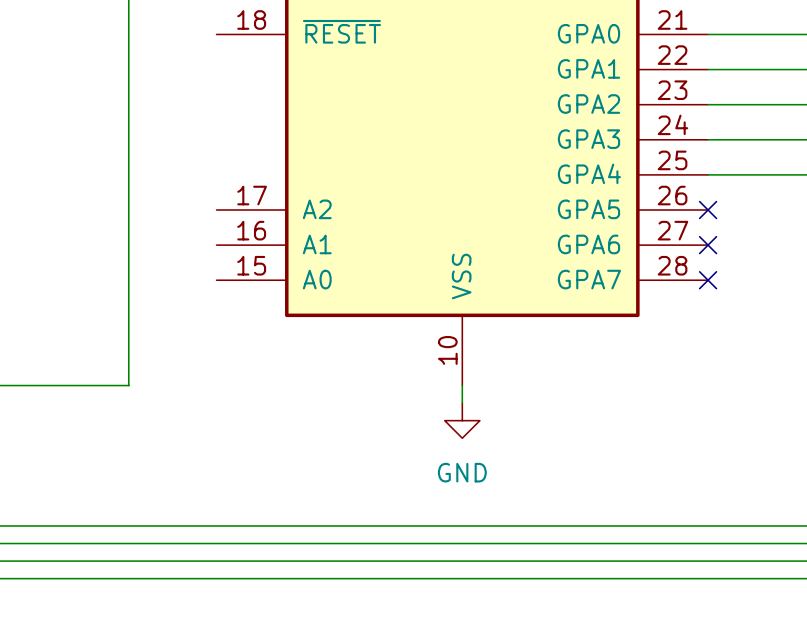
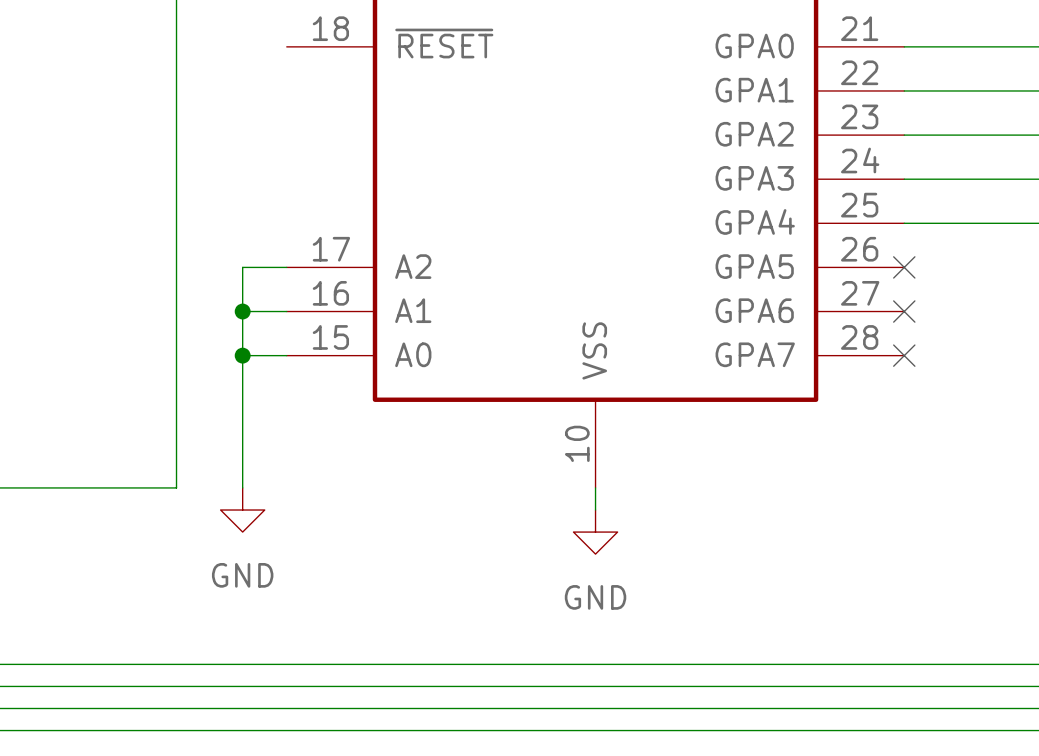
wire: none -> (286, 267) (242, 267) (242, 487)
wire: none -> (242, 311) (286, 311)
junction: none -> (242, 311)
wire: none -> (242, 355) (286, 355)
junction: none -> (242, 355)
power symbol: none -> GND (242, 510)

